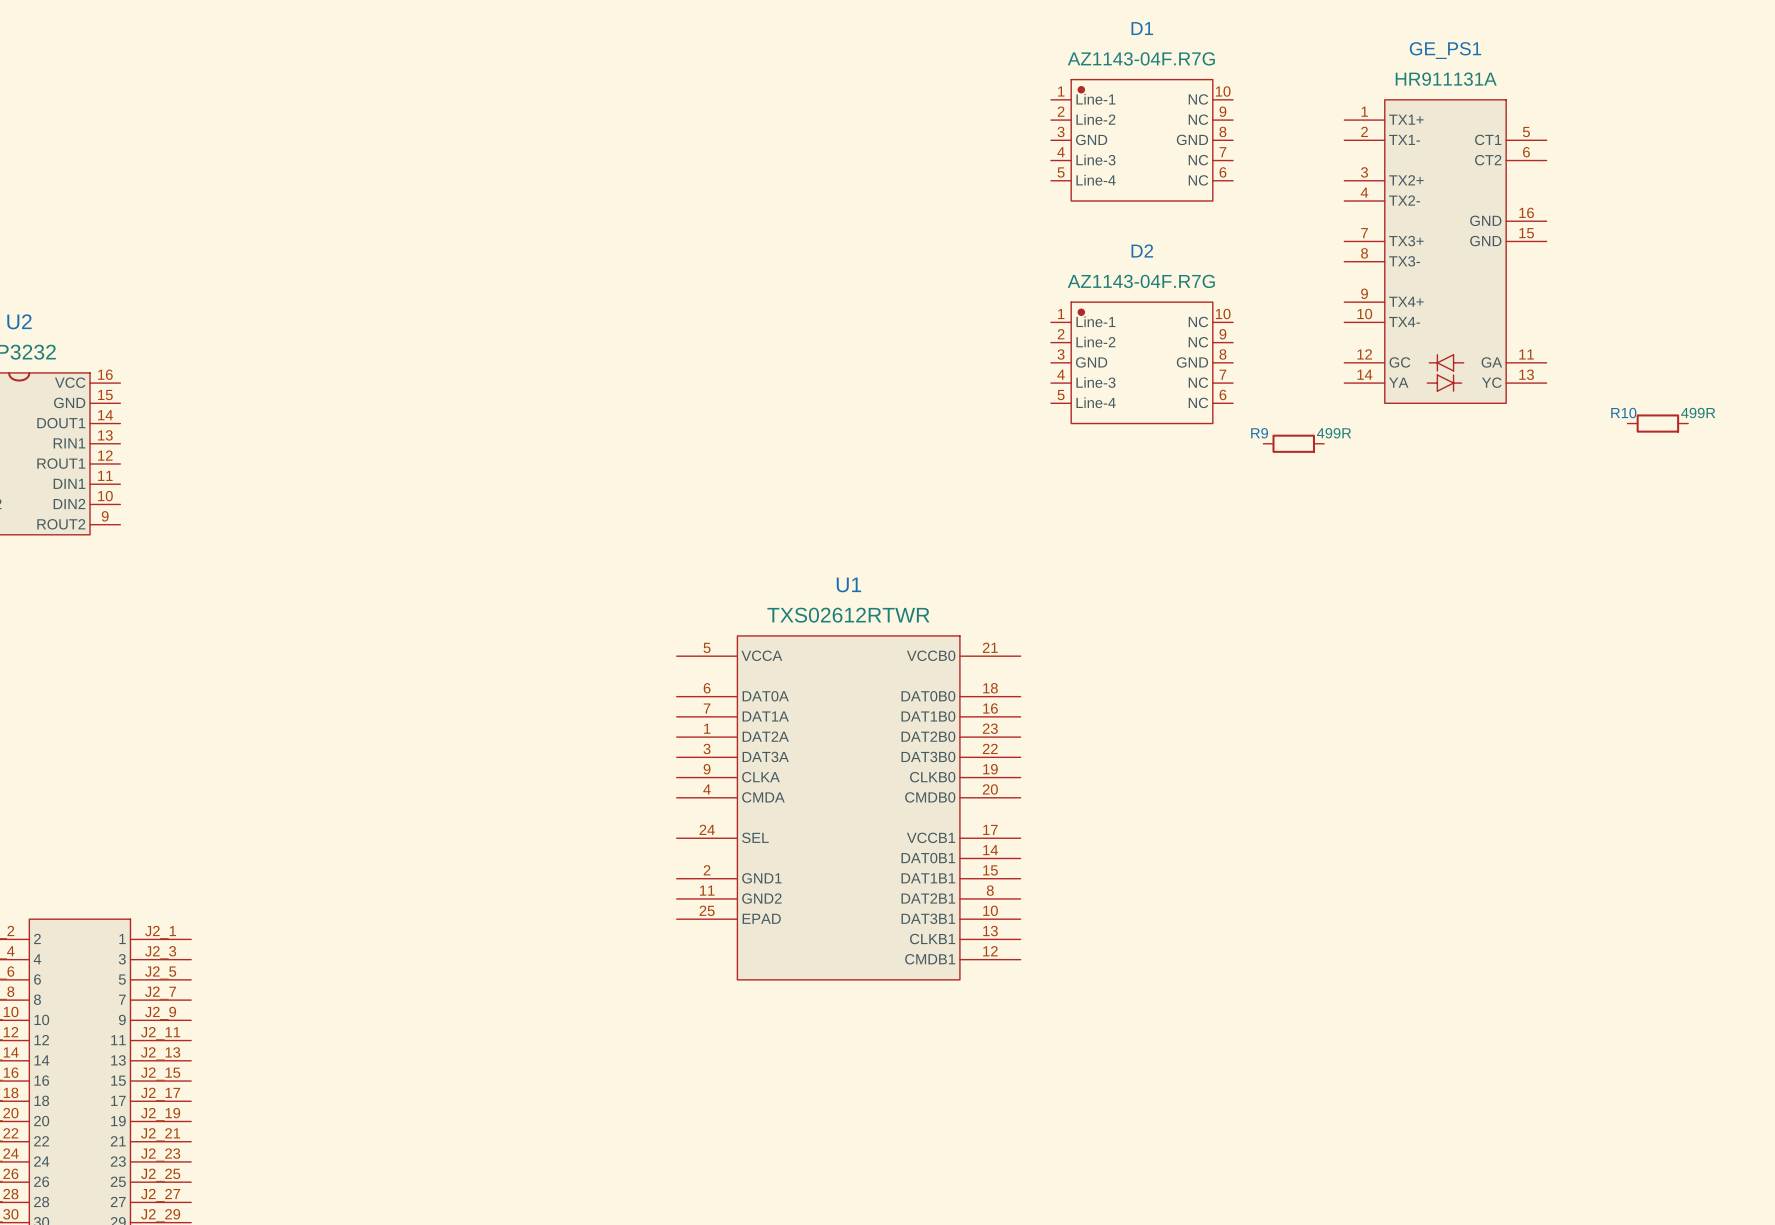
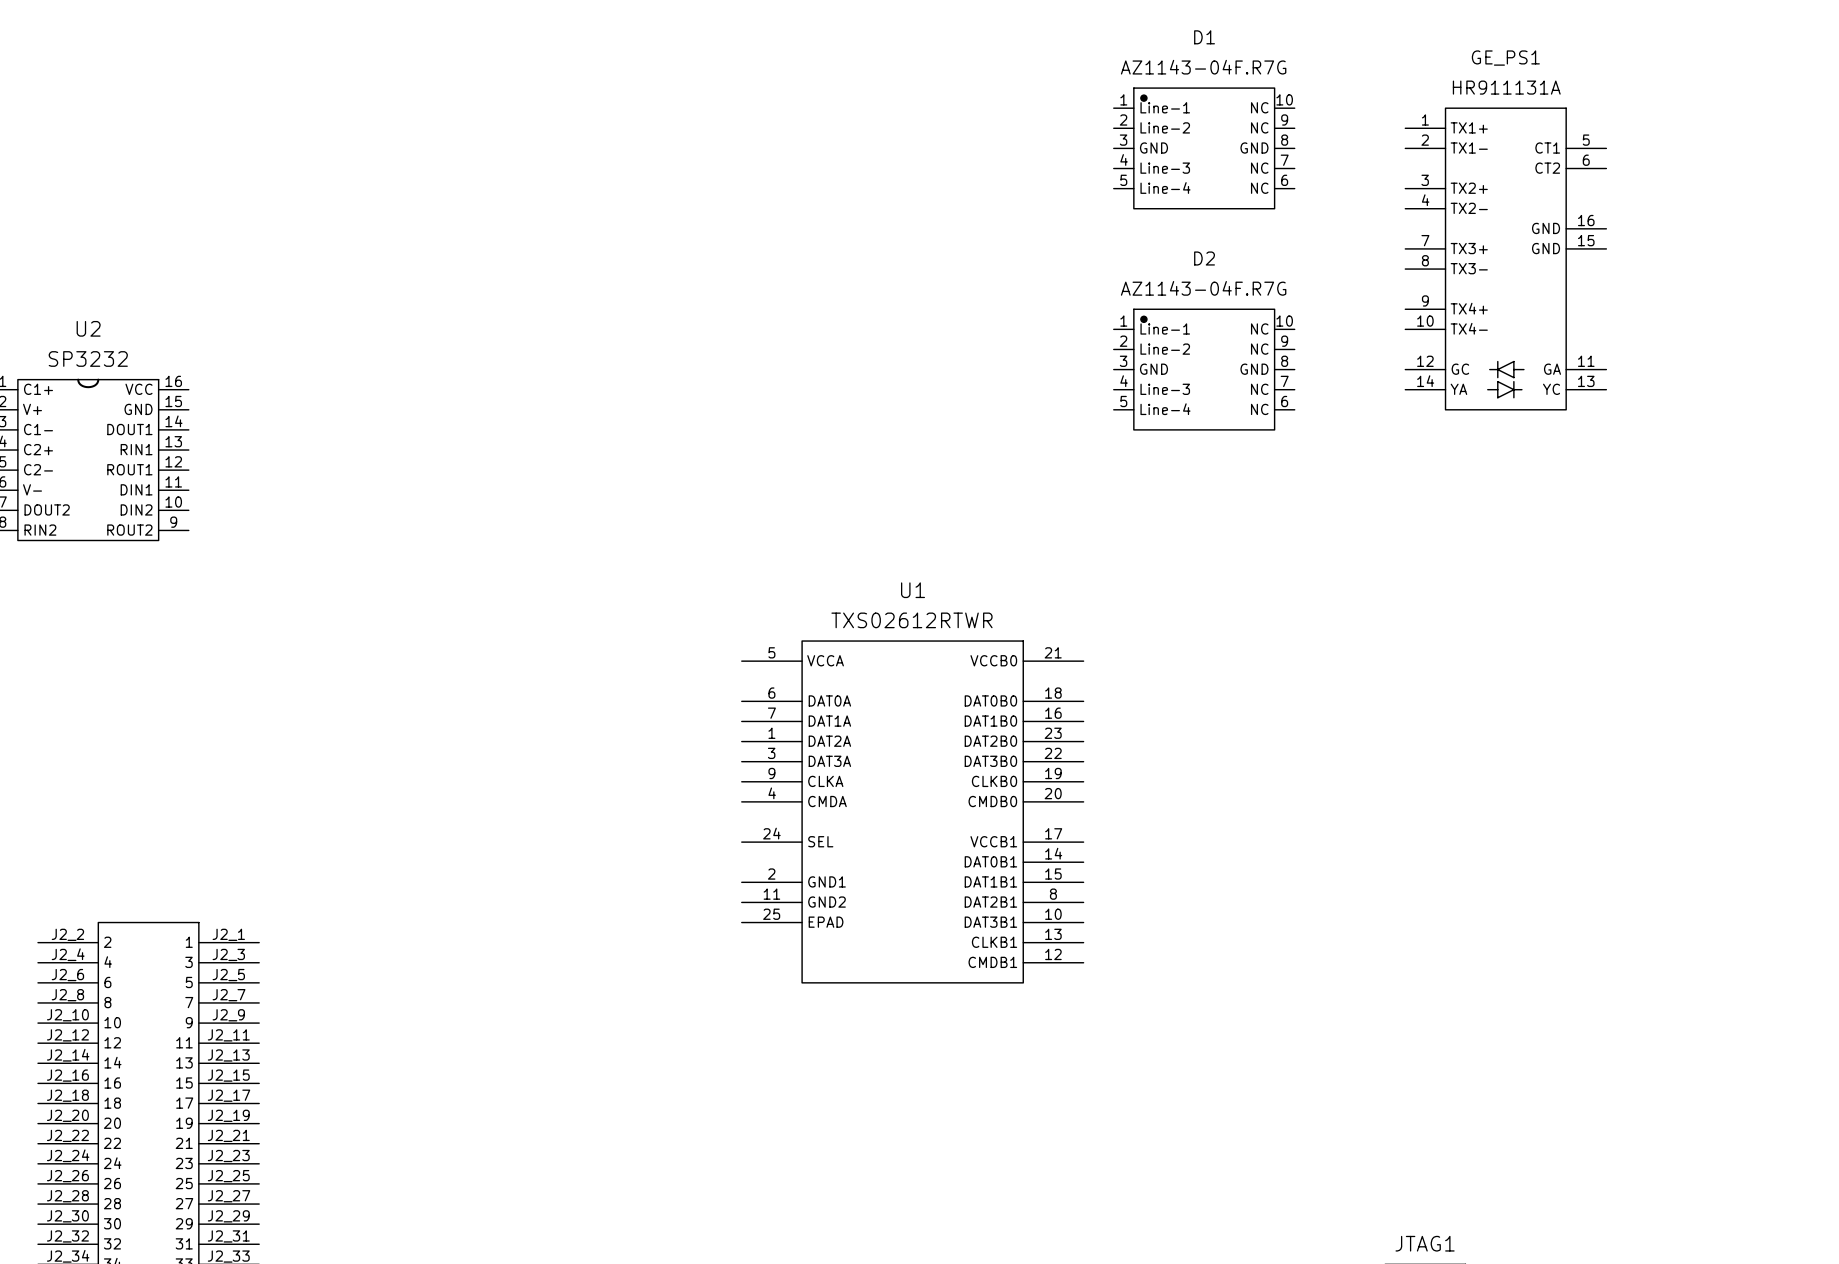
R10: 499R (1657, 423) -> none
R9: 499R (1293, 443) -> none

